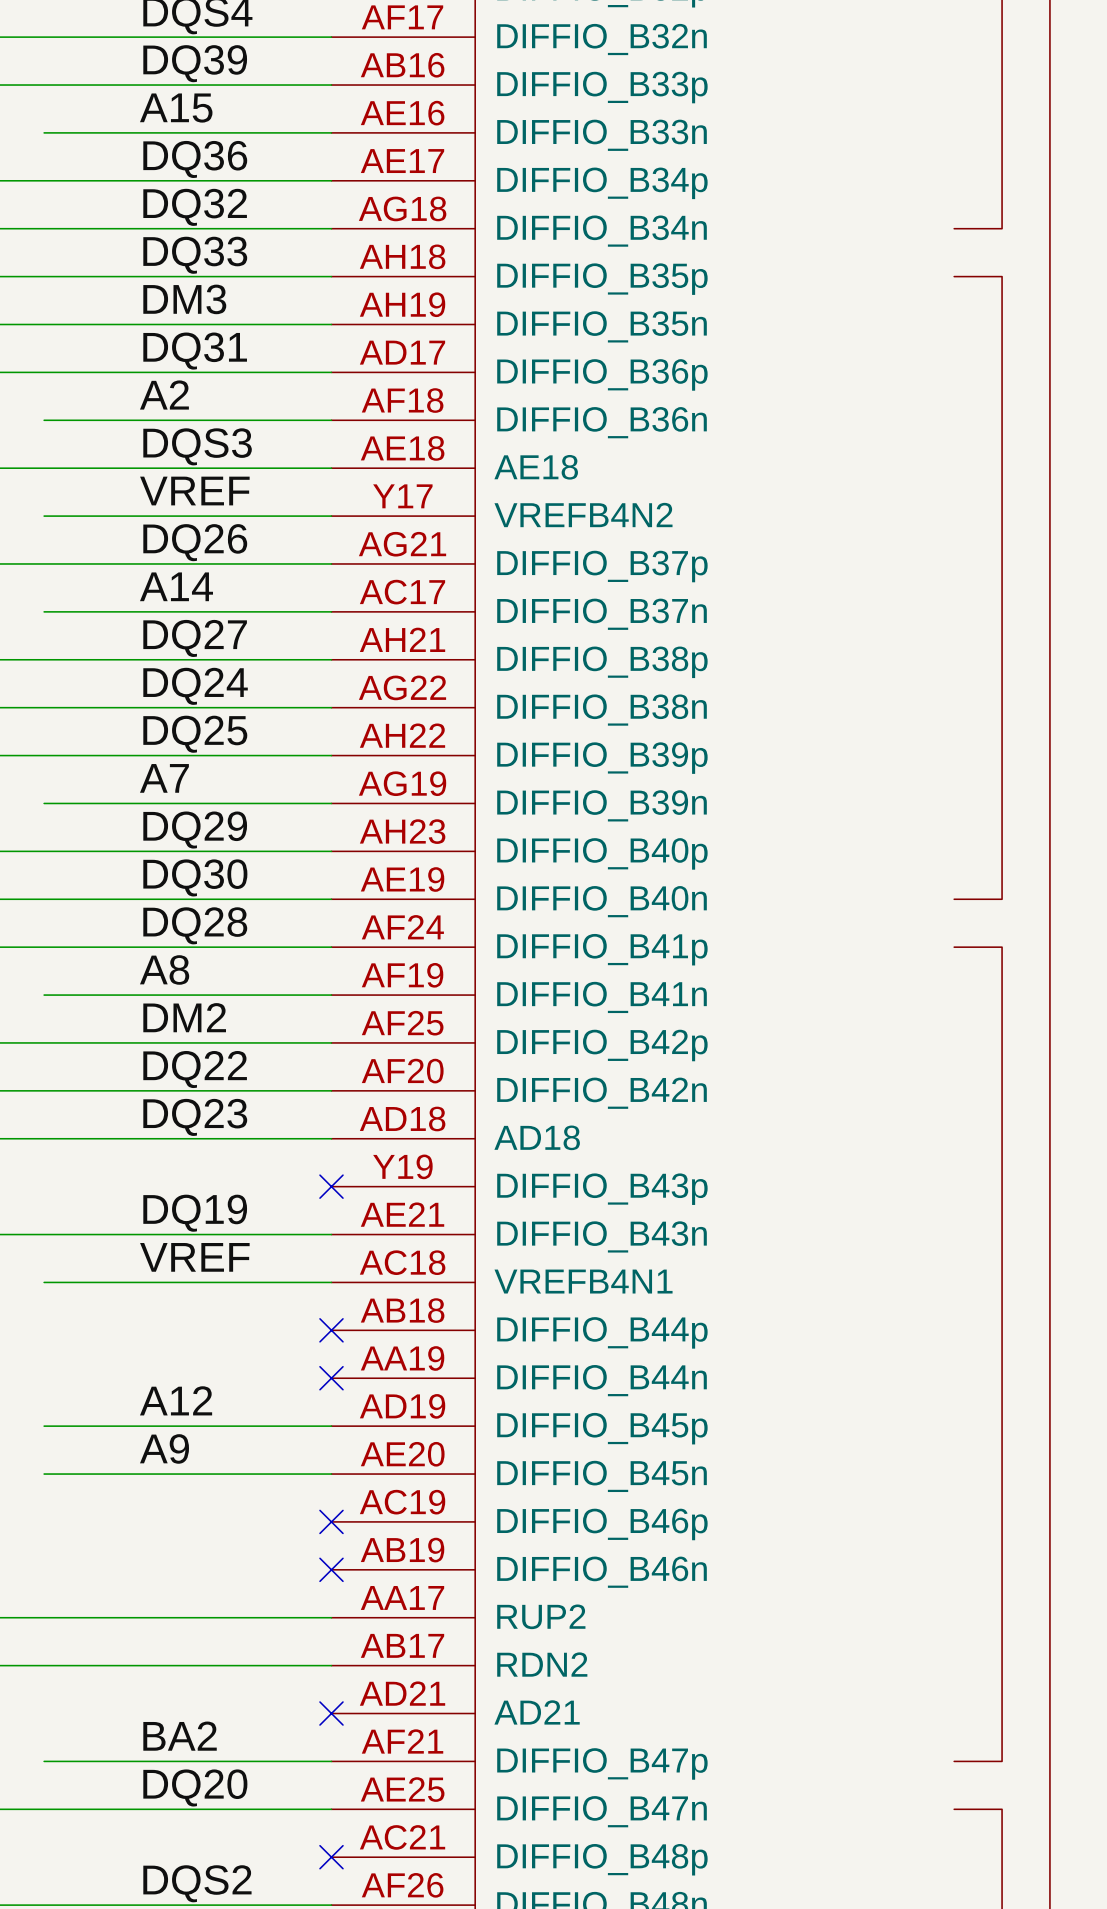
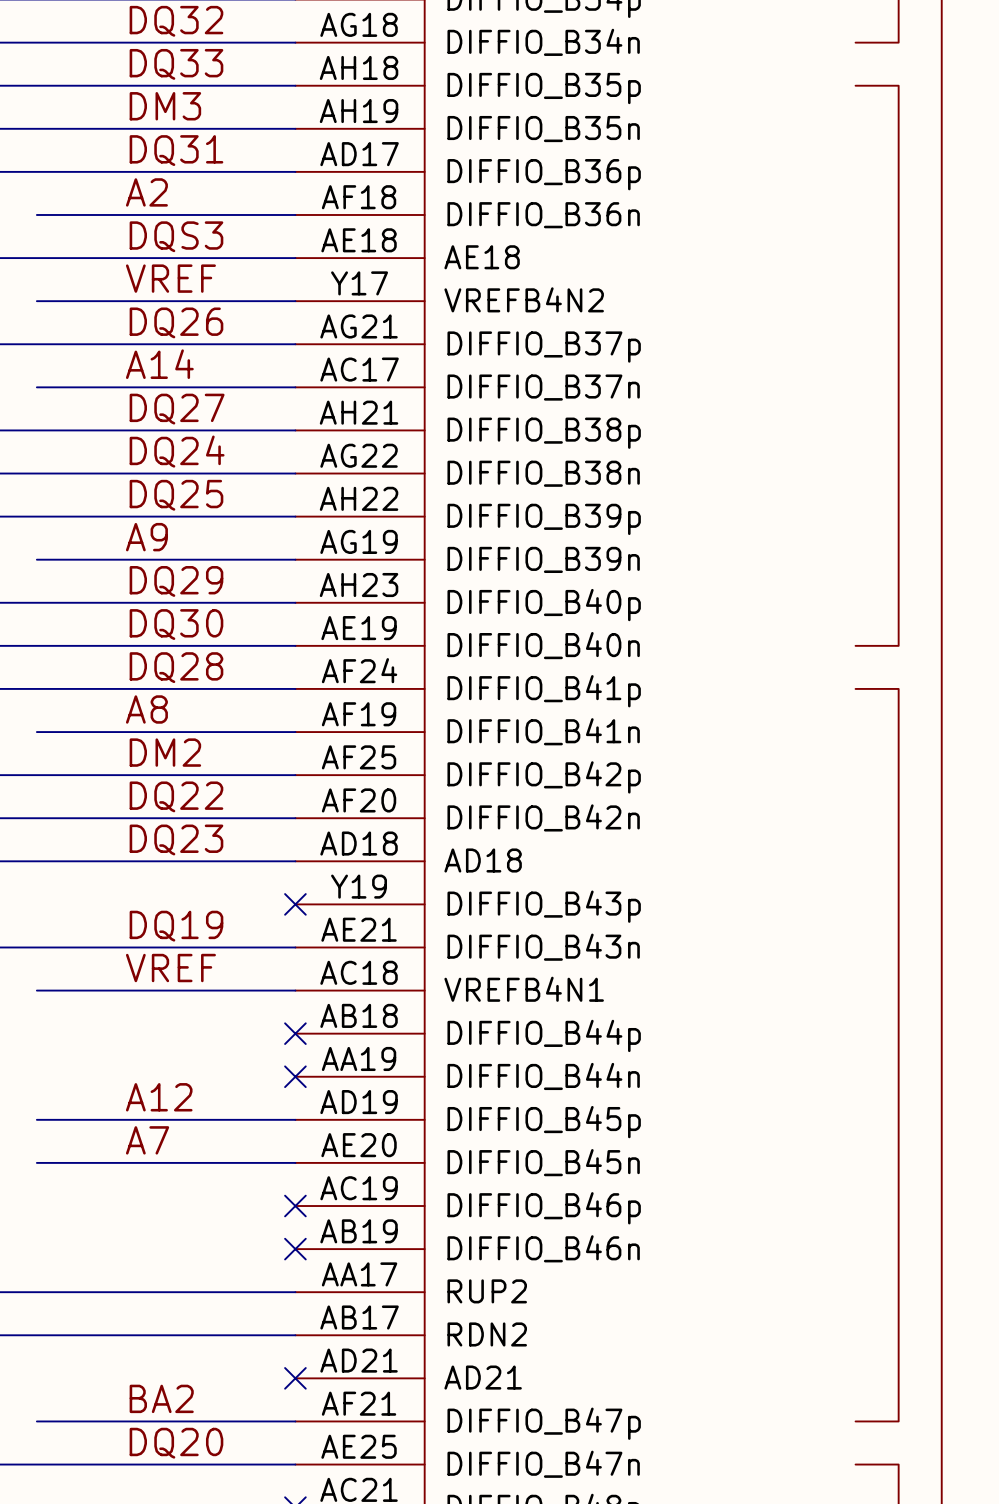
label: A7 (164, 778) -> A9 (146, 537)
label: A9 (164, 1448) -> A7 (147, 1140)

